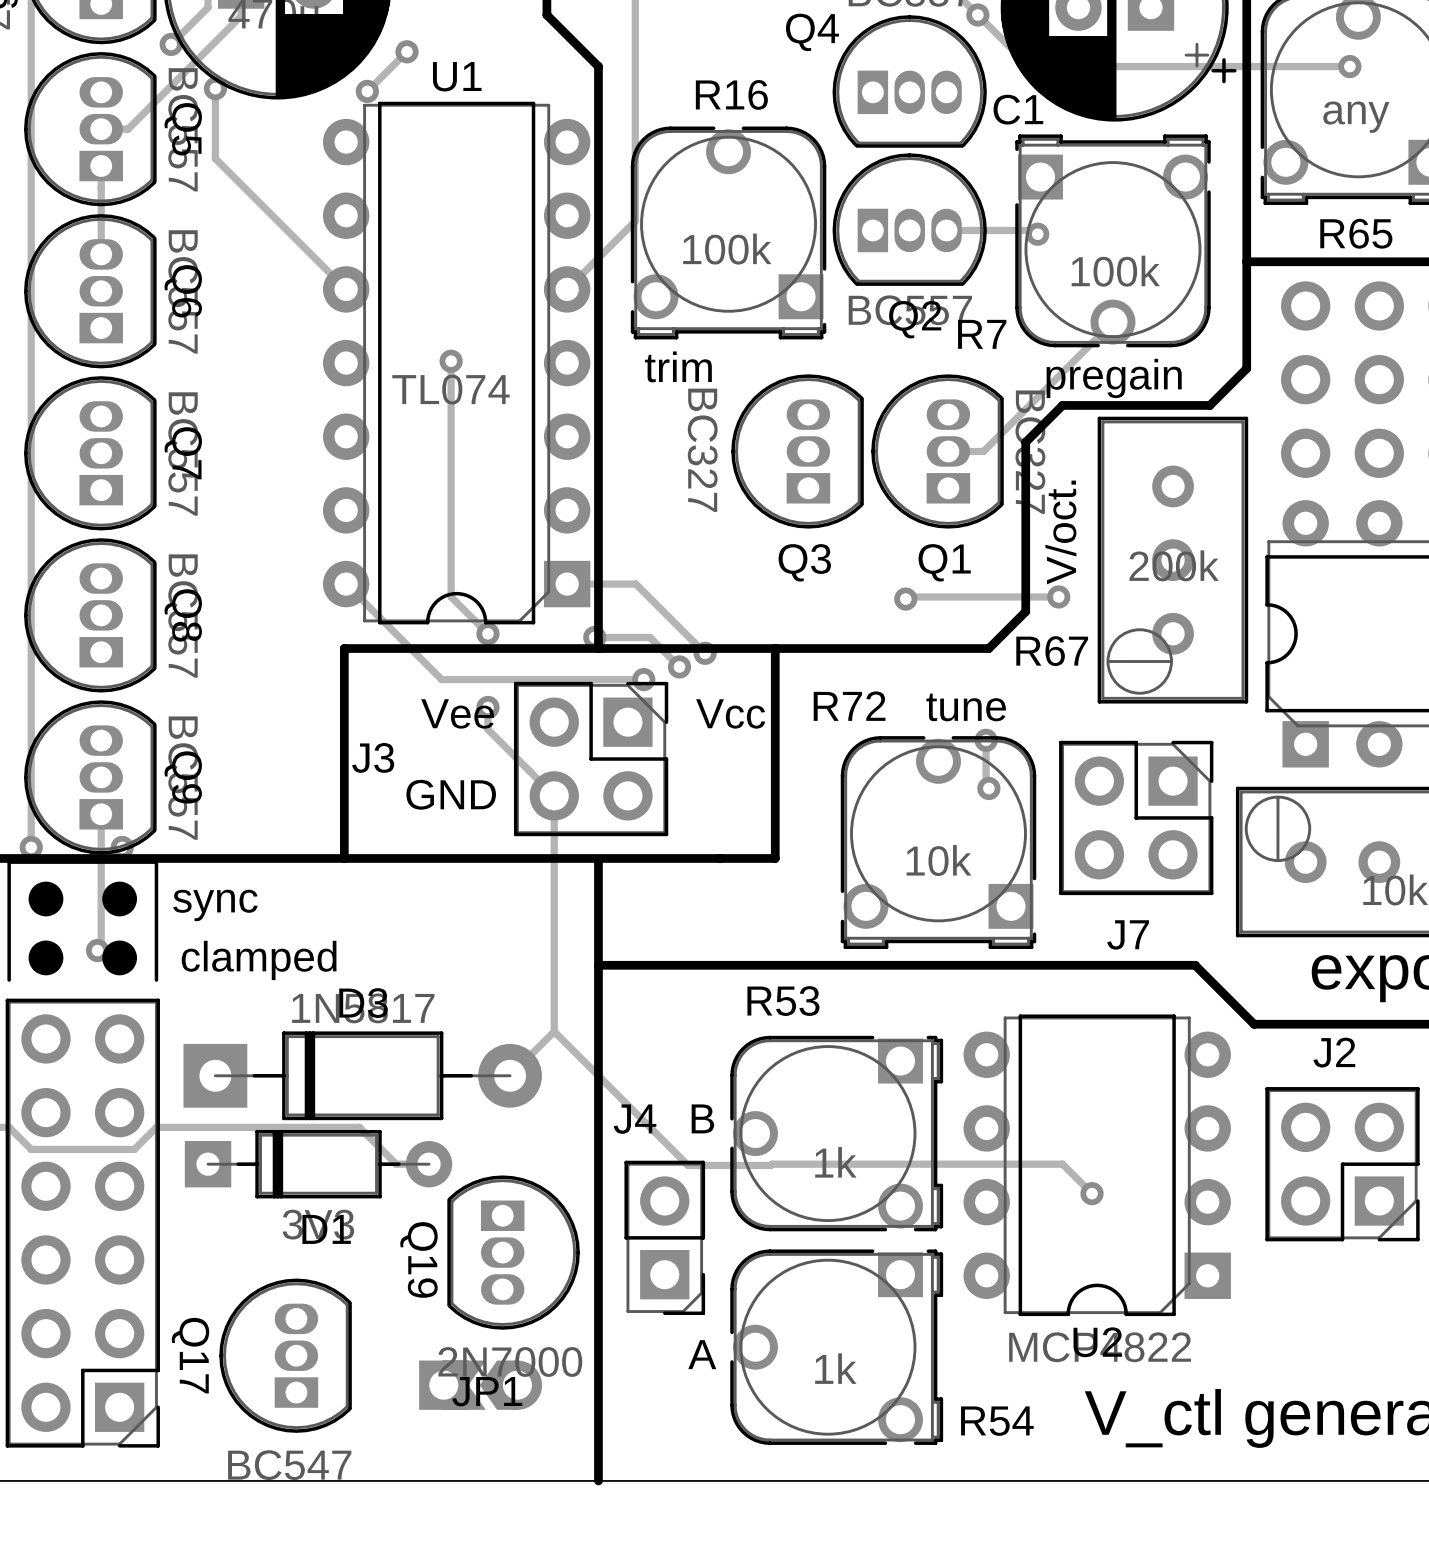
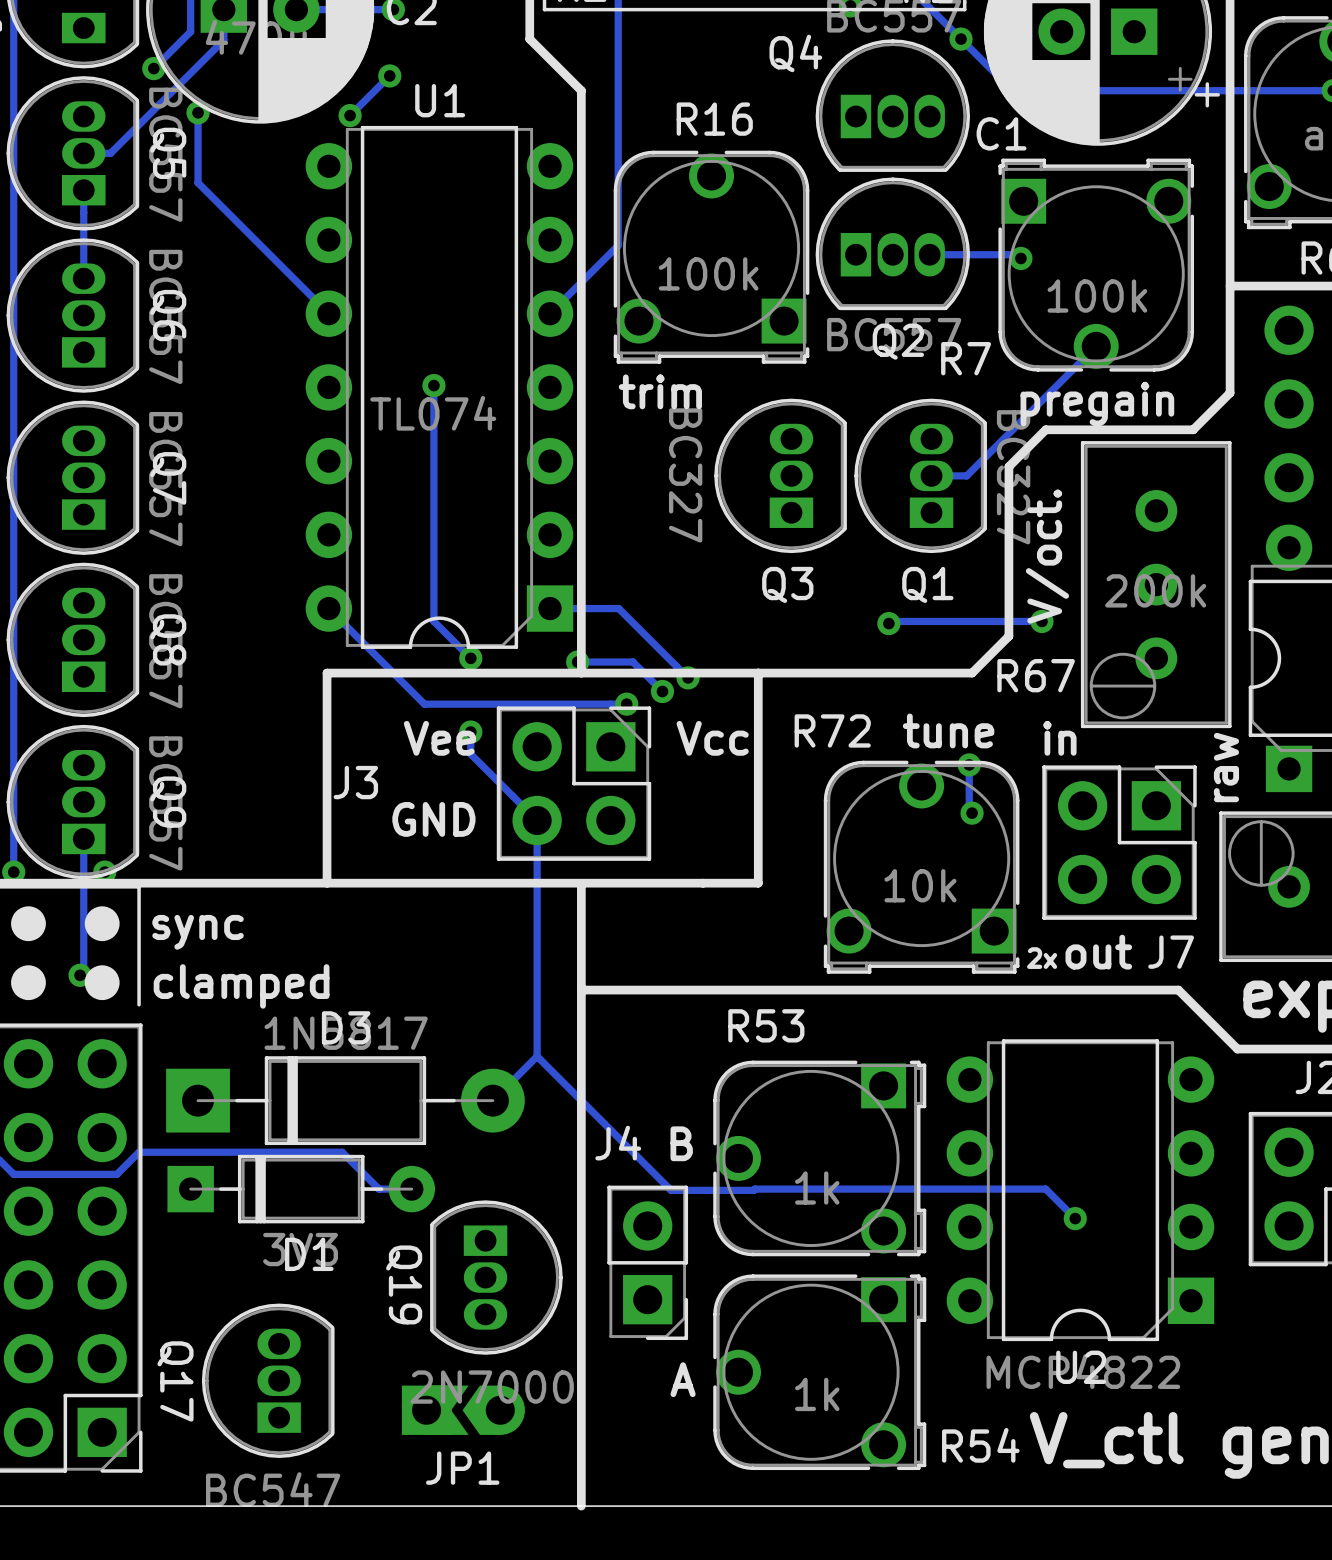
text: none -> in (1059, 738)
text: none -> raw (1226, 767)
text: none -> out (1098, 952)
text: none -> 2x (1042, 958)
J7 name position: J7 (1128, 934) -> J7 (1171, 952)
JP1 name position: JP1 (487, 1391) -> JP1 (462, 1468)

